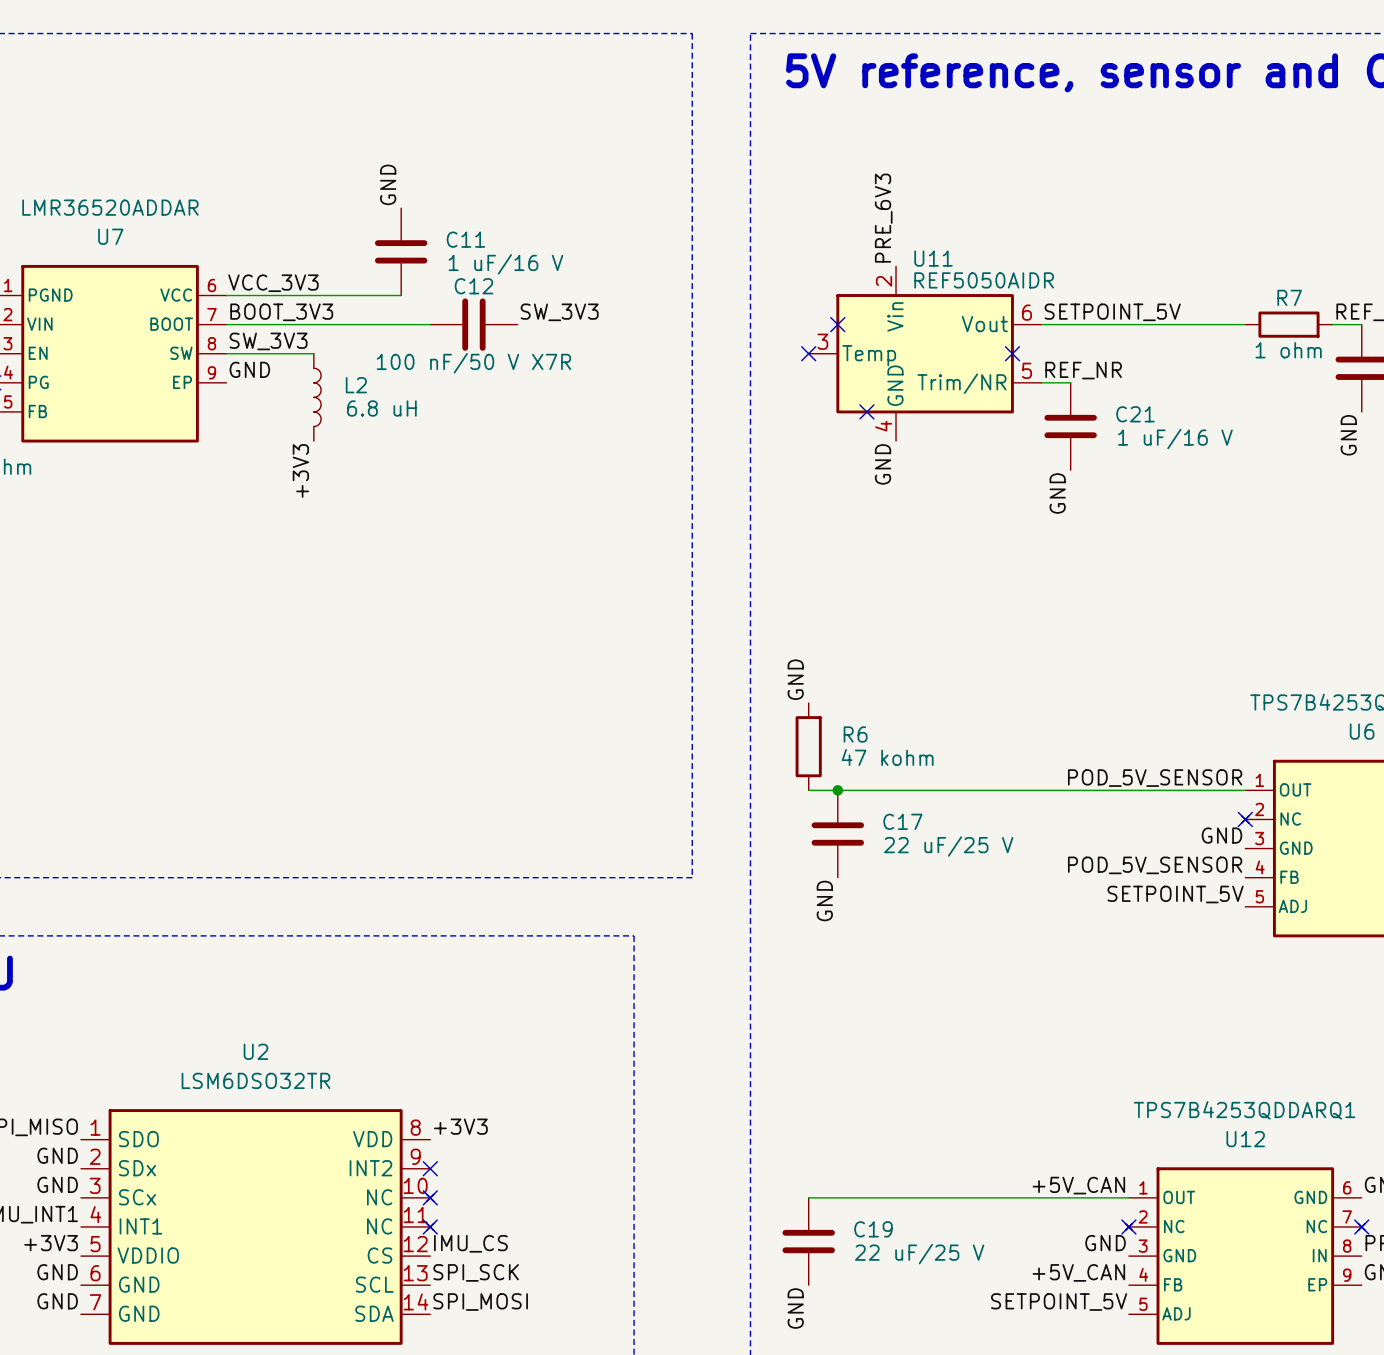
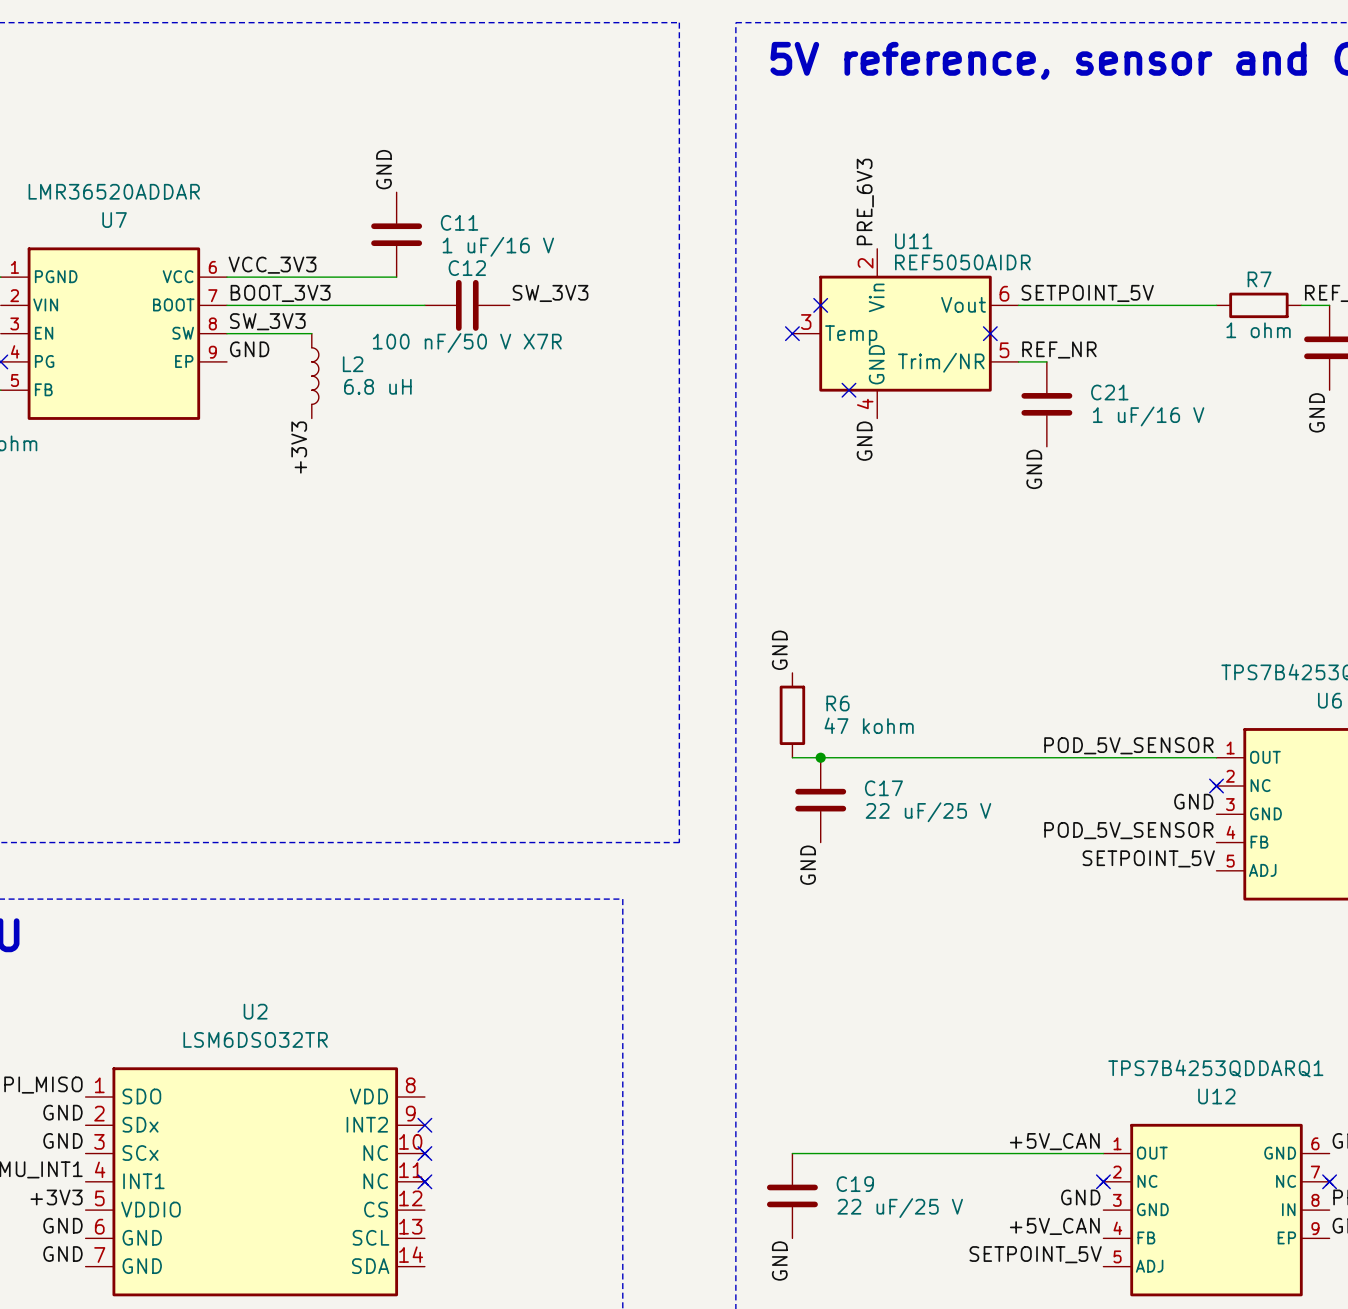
label: +3V3 (460, 1126) -> none
label: IMU_CS (470, 1243) -> none
label: SPI_SCK (476, 1272) -> none
label: SPI_MOSI (480, 1302) -> none

